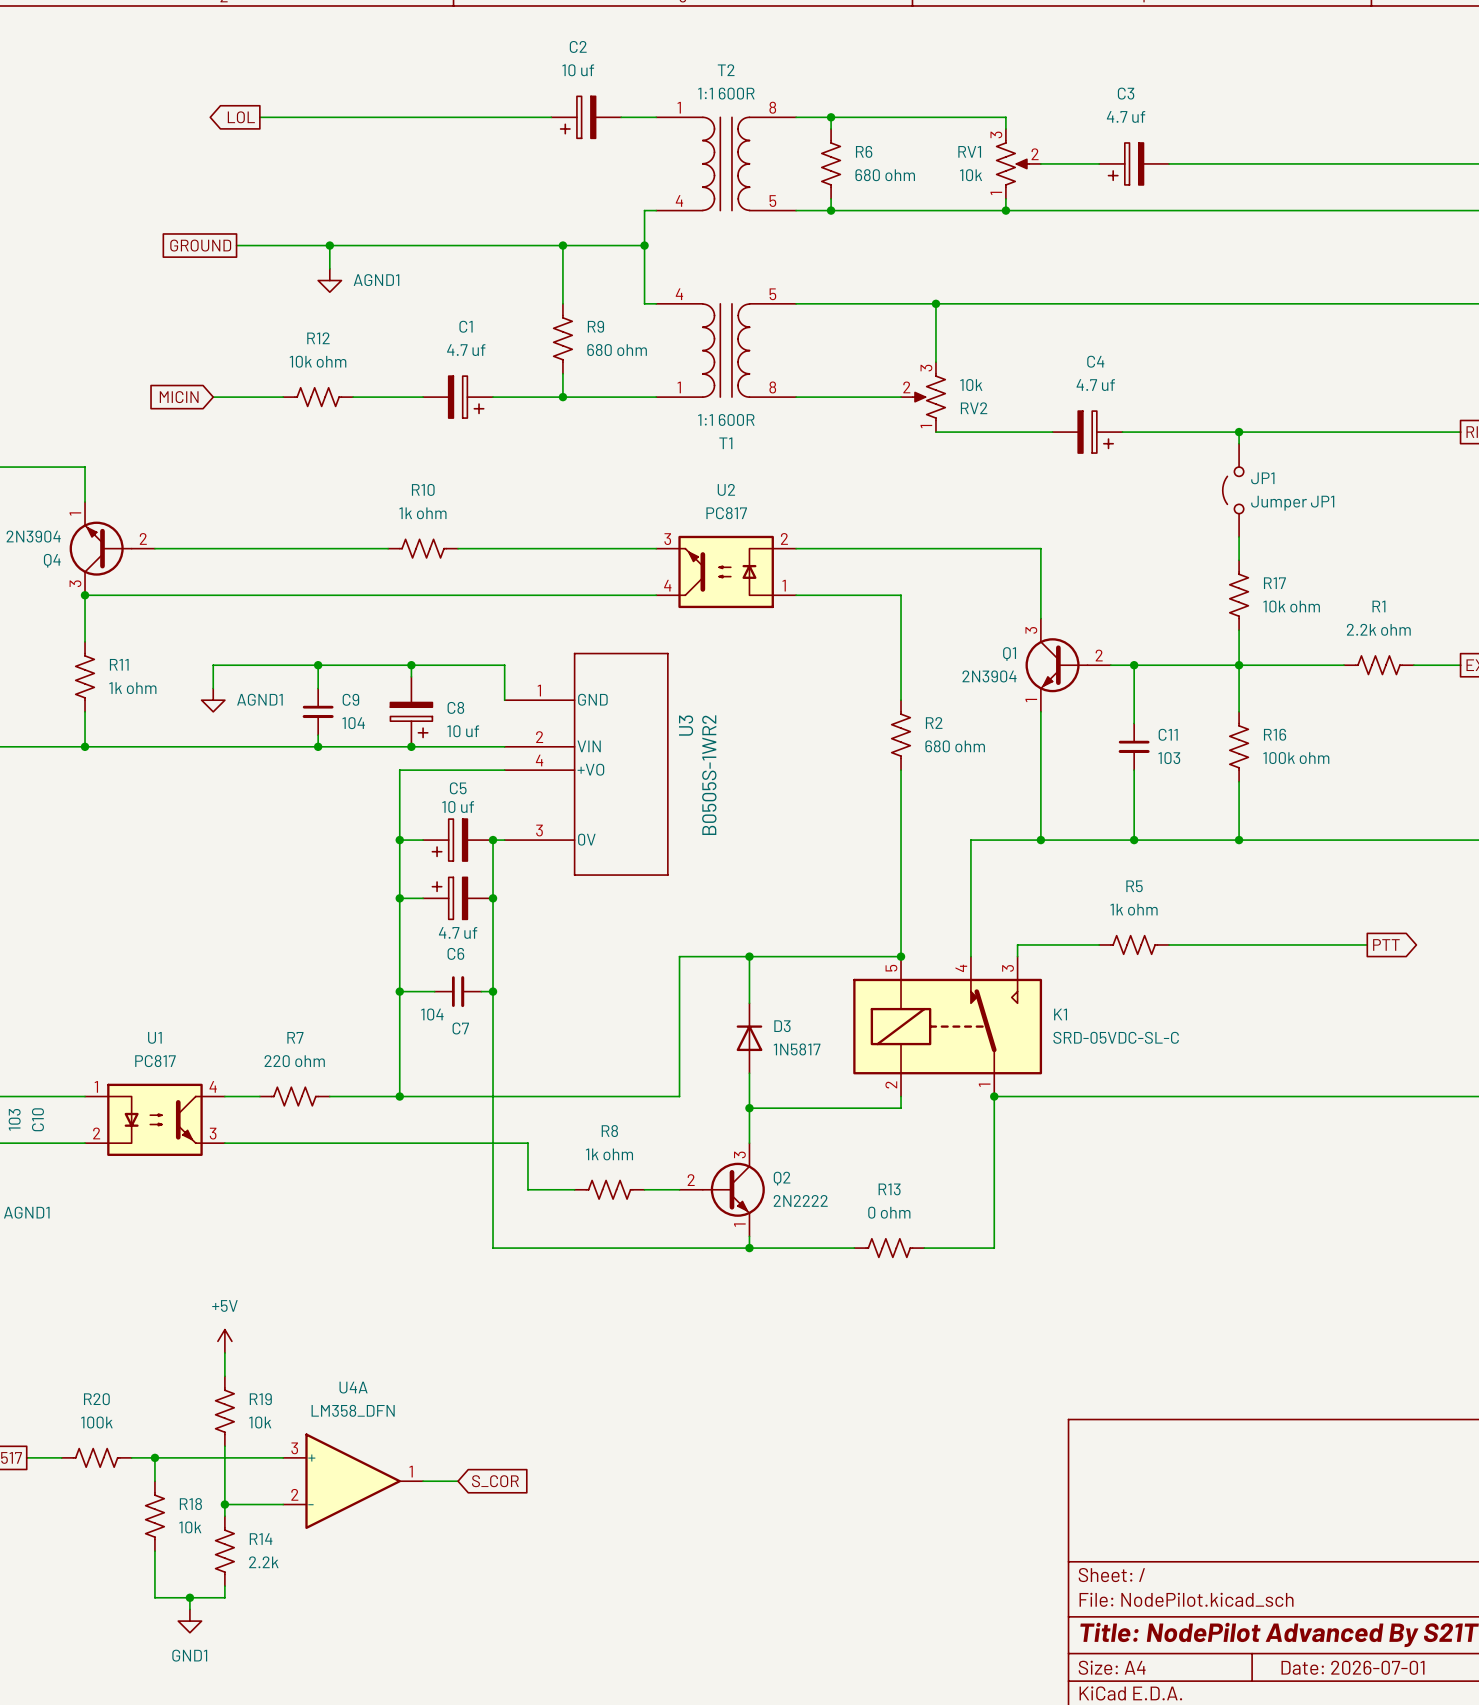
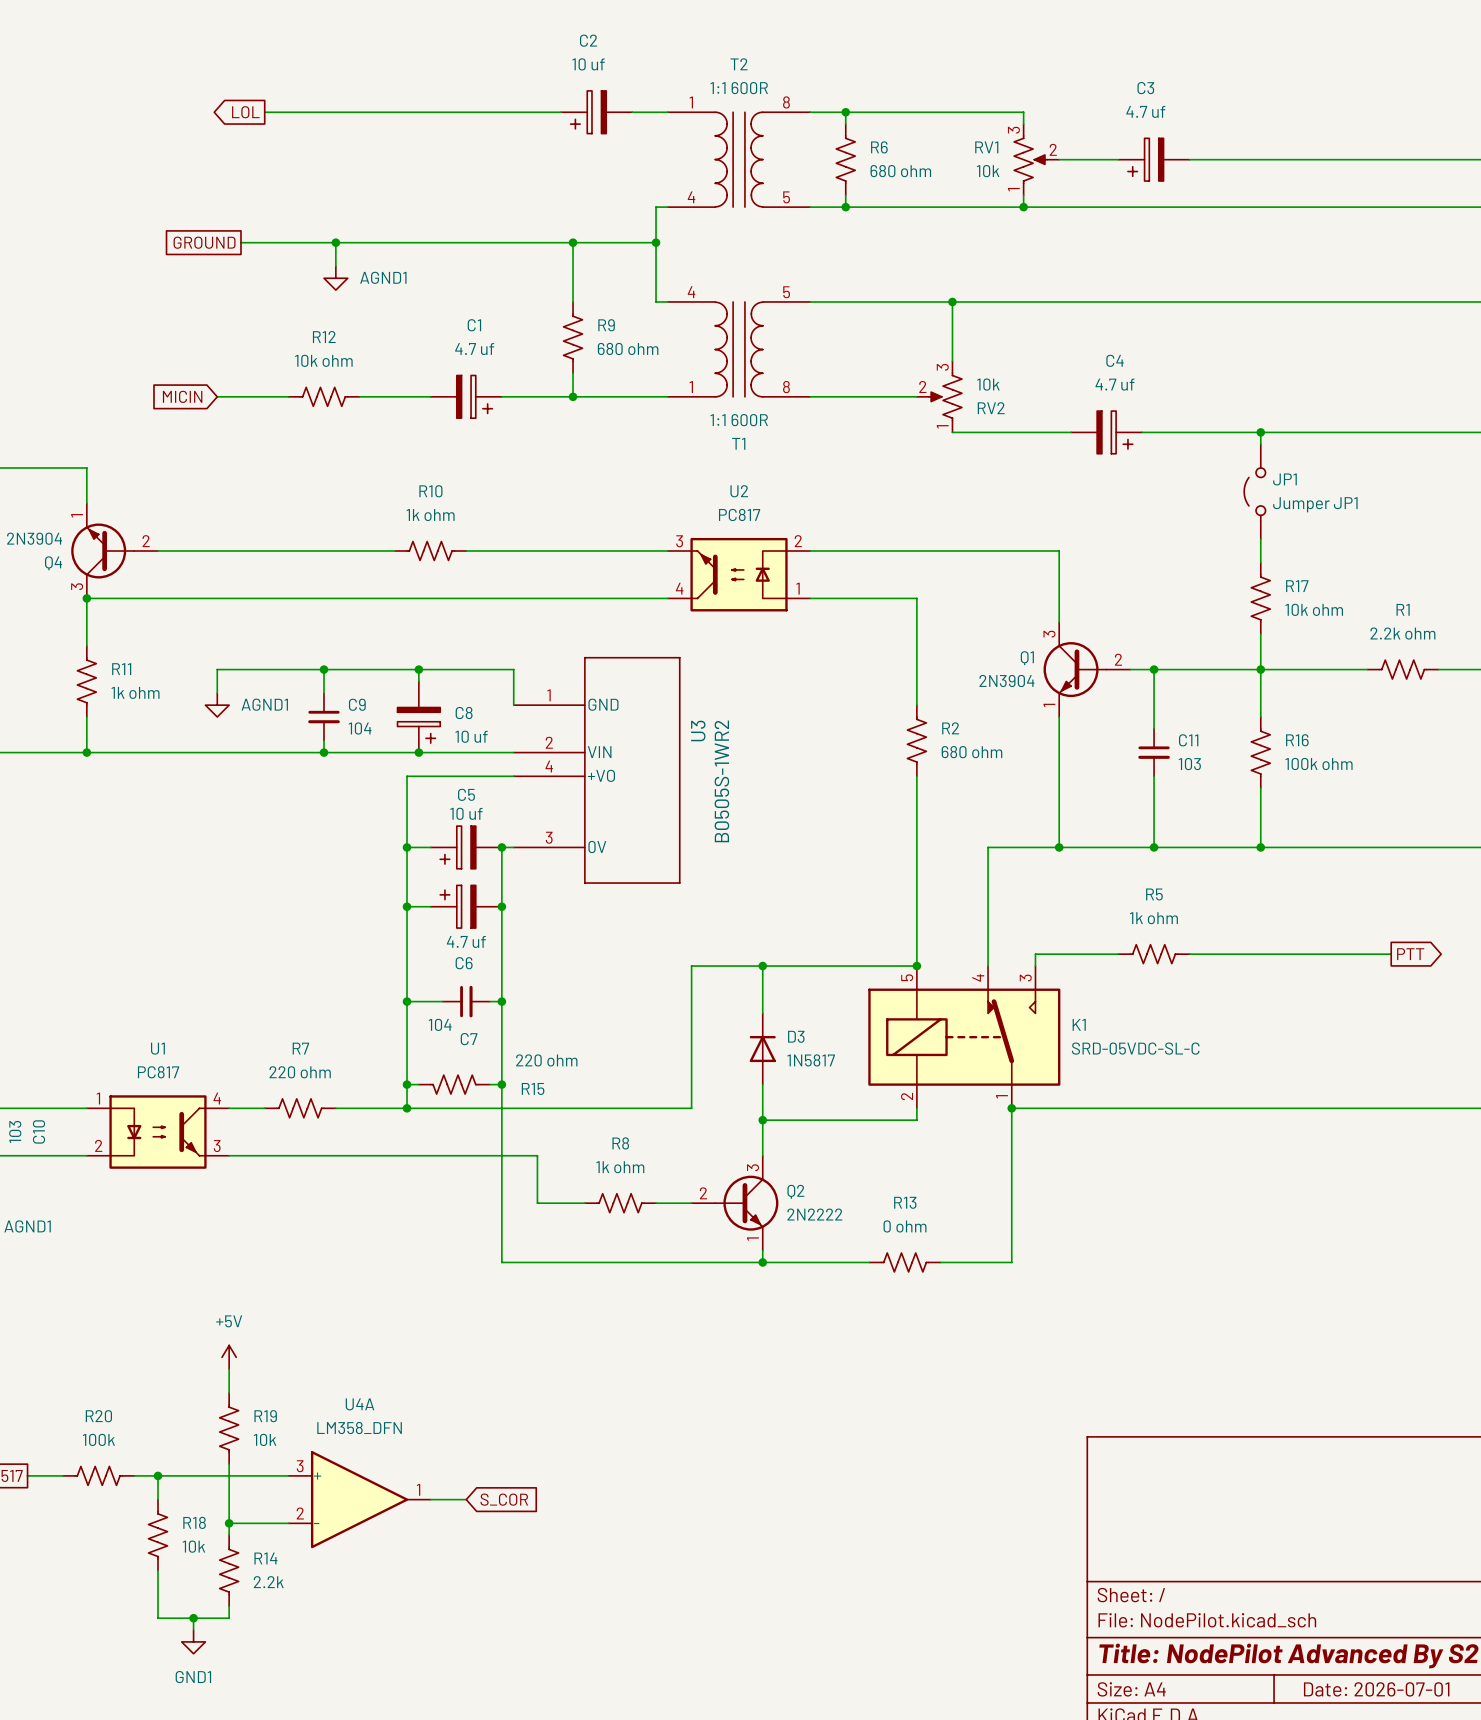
wire: none -> (407, 1084) (418, 1084)
junction: none -> (407, 1084)
R15: none -> 220 ohm (454, 1084)
wire: none -> (490, 1084) (501, 1084)
junction: none -> (501, 1084)

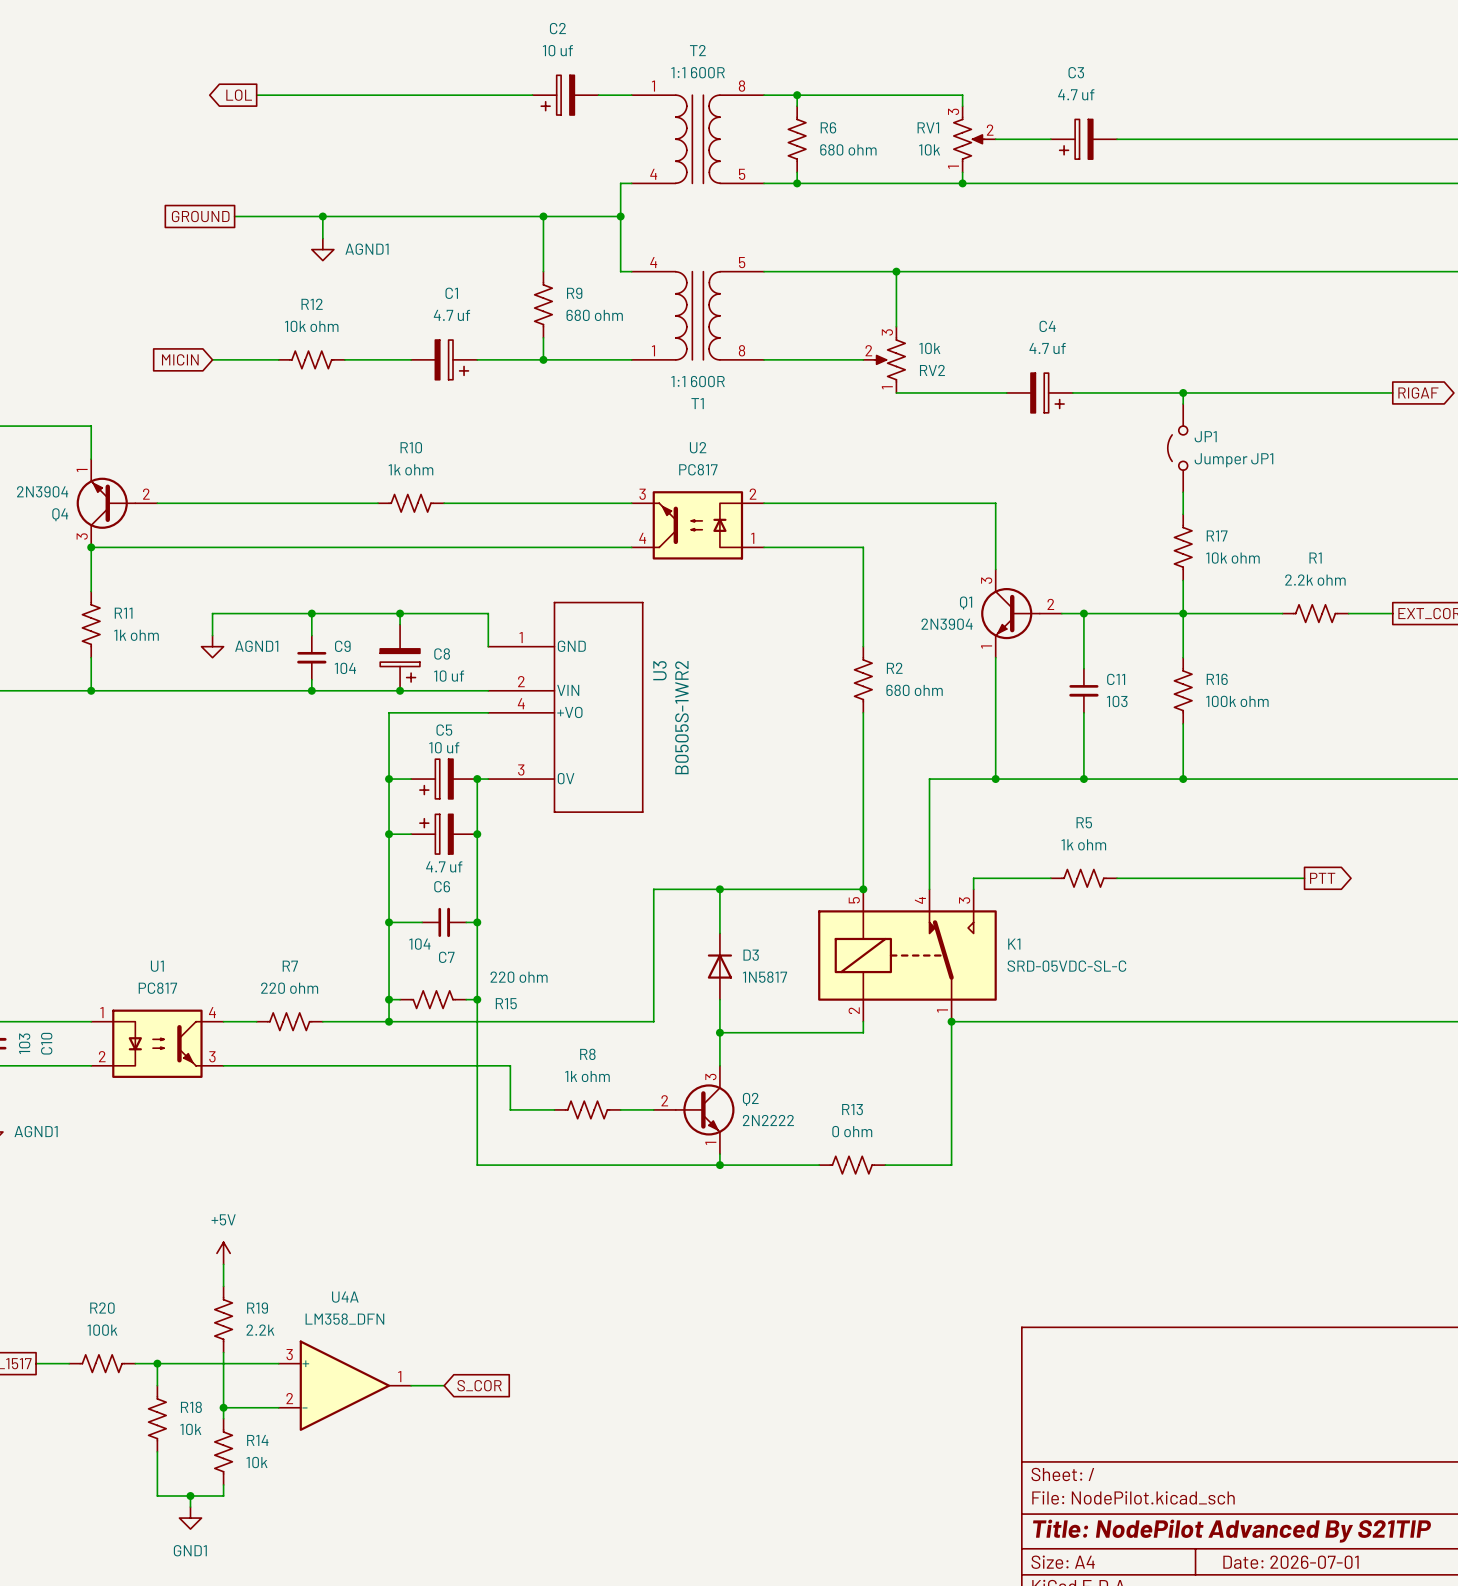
R19 value: 10k (265, 1439) -> 2.2k (260, 1330)
R14 value: 2.2k (268, 1582) -> 10k (257, 1462)

